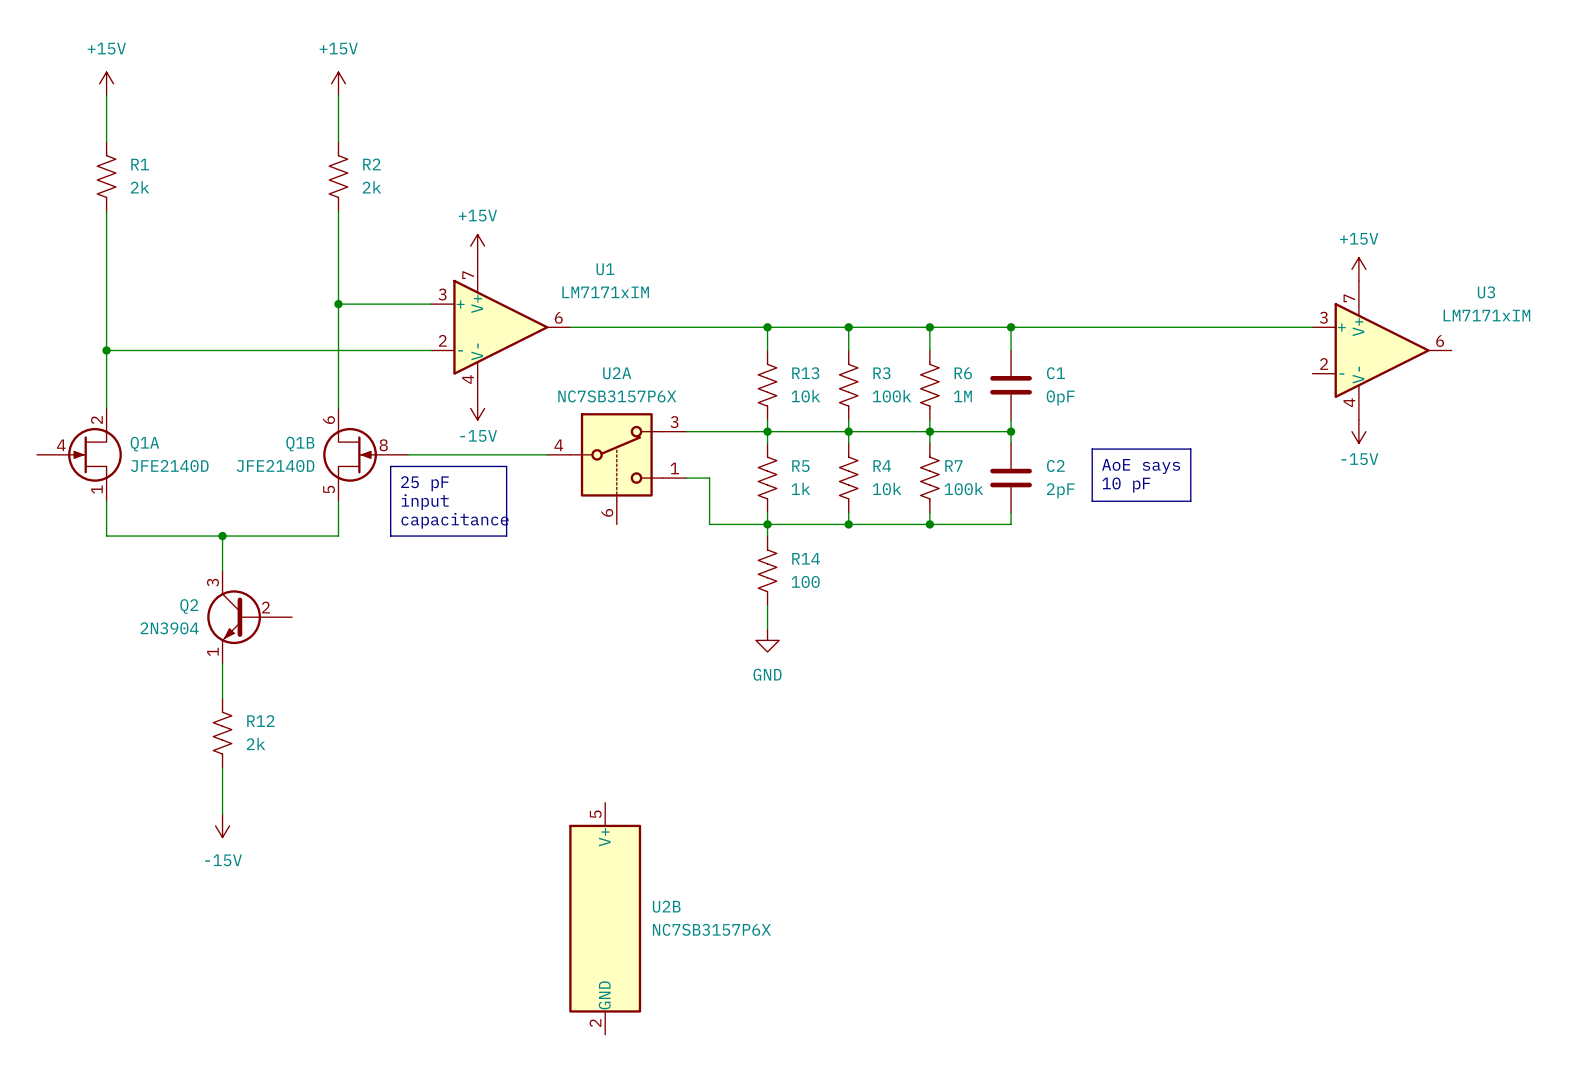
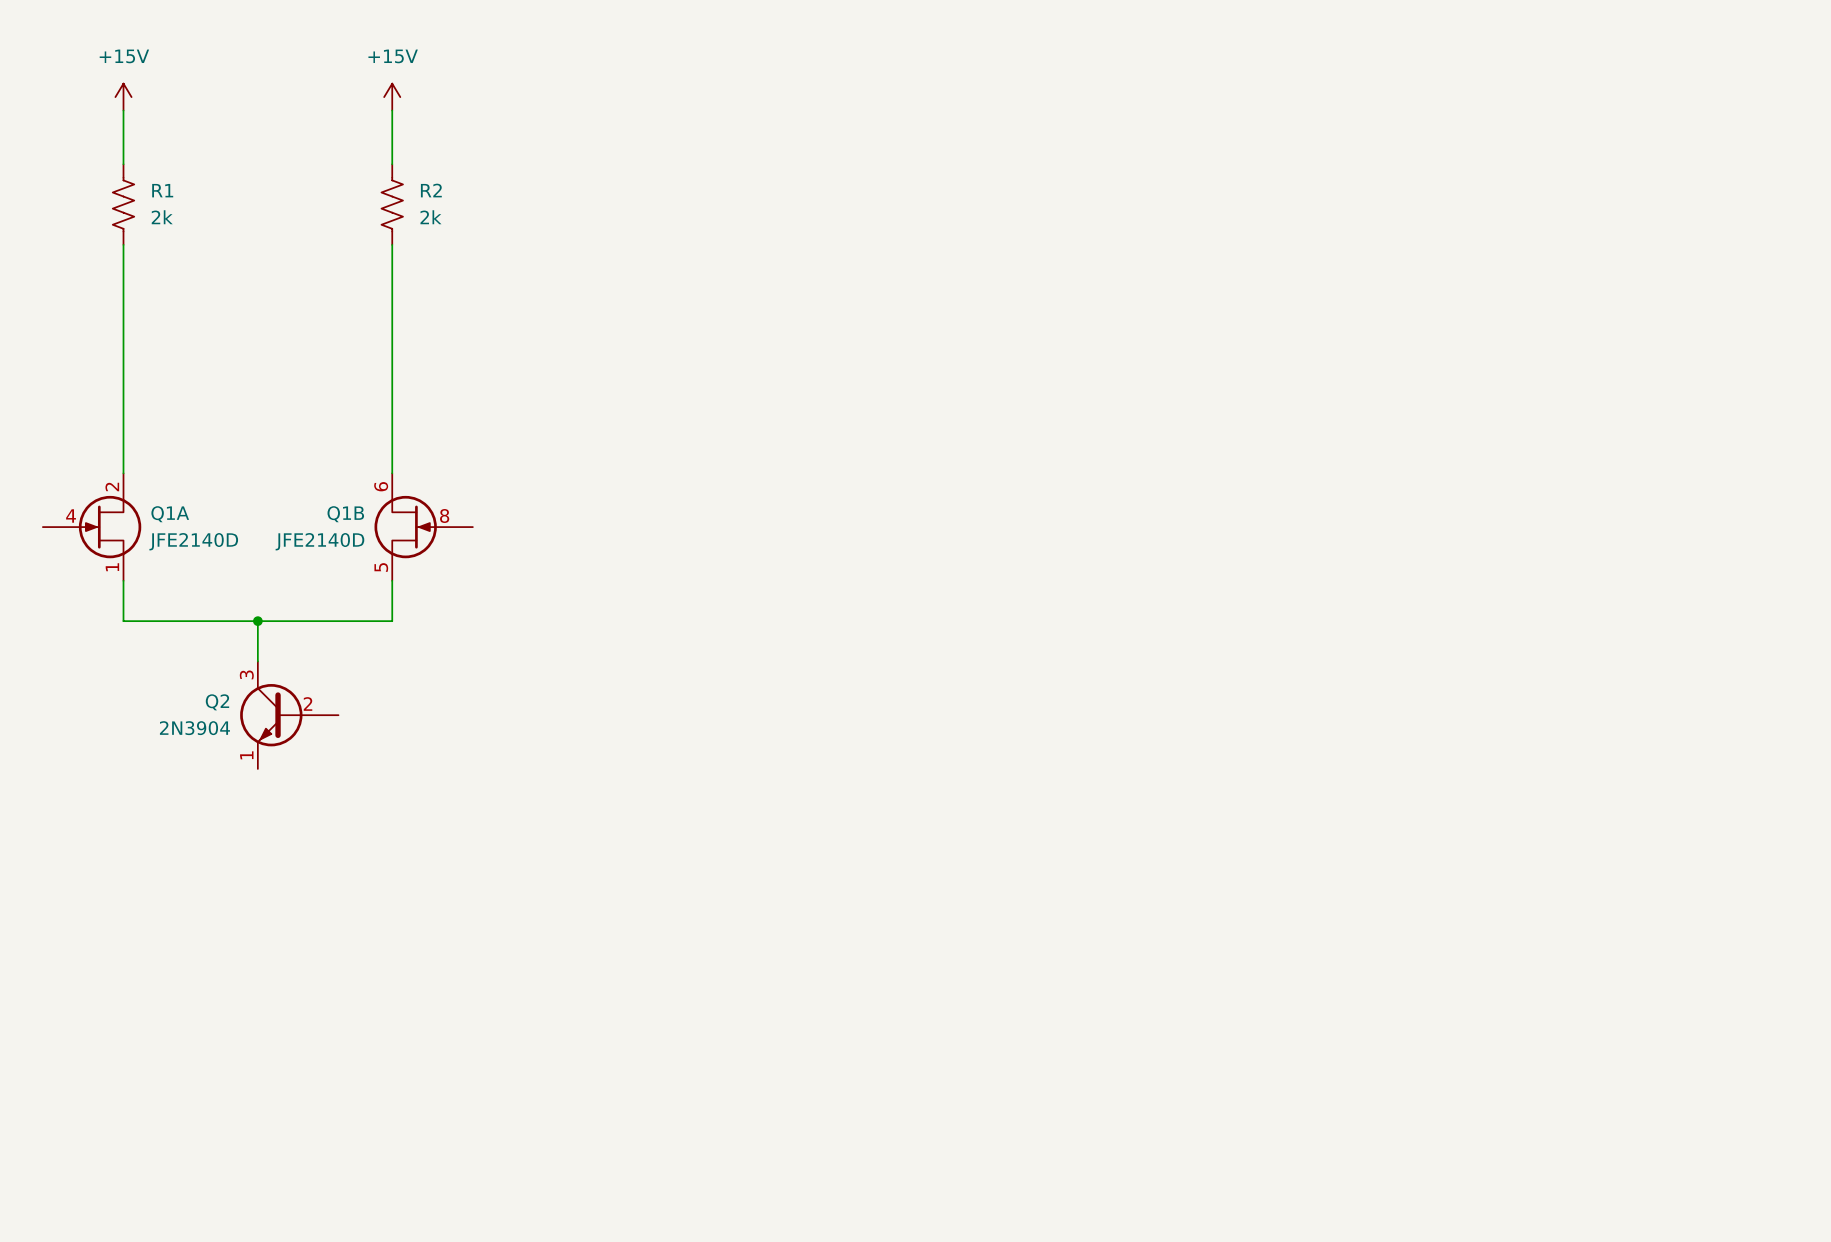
power symbol: +15V (477, 246) -> none
power symbol: +15V (1358, 269) -> none
wire: (338, 304) (431, 304) -> none
junction: (338, 304) -> none
U1: LM7171xIM (500, 327) -> none
wire: (570, 327) (1312, 327) -> none
wire: (767, 327) (767, 350) -> none
junction: (767, 327) -> none
wire: (848, 327) (848, 350) -> none
junction: (848, 327) -> none
wire: (929, 327) (929, 350) -> none
junction: (929, 327) -> none
wire: (1011, 327) (1011, 350) -> none
junction: (1011, 327) -> none
wire: (106, 350) (431, 350) -> none
junction: (106, 350) -> none
U3: LM7171xIM (1382, 350) -> none
R13: 10k (767, 385) -> none
R3: 100k (848, 385) -> none
R6: 1M (929, 385) -> none
C1: 0pF (1011, 385) -> none
power symbol: -15V (477, 408) -> none
wire: (767, 420) (767, 443) -> none
wire: (848, 420) (848, 443) -> none
wire: (929, 420) (929, 443) -> none
wire: (1011, 420) (1011, 443) -> none
wire: (686, 431) (1011, 431) -> none
junction: (767, 431) -> none
junction: (848, 431) -> none
junction: (929, 431) -> none
junction: (1011, 431) -> none
power symbol: -15V (1358, 431) -> none
line: (1092, 449) (1190, 449) (1190, 501) (1092, 501) (1092, 449) -> none
wire: (408, 454) (547, 454) -> none
line: (390, 466) (506, 466) (506, 536) (390, 536) (390, 466) -> none
text: AoE says (1141, 466) -> none
U2A: NC7SB3157P6X (616, 468) -> none
wire: (686, 478) (709, 478) (709, 524) (1011, 524) (1011, 512) -> none
R5: 1k (767, 478) -> none
R4: 10k (848, 478) -> none
R7: 100k (929, 478) -> none
C2: 2pF (1011, 478) -> none
text: 25 pF (424, 483) -> none
text: 10 pF (1126, 485) -> none
text: input (425, 502) -> none
wire: (767, 512) (767, 536) -> none
wire: (848, 512) (848, 524) -> none
wire: (929, 512) (929, 524) -> none
text: capacitance (455, 520) -> none
junction: (767, 524) -> none
junction: (848, 524) -> none
junction: (929, 524) -> none
R14: 100 (767, 570) -> none
wire: (767, 605) (767, 628) -> none
power symbol: GND (767, 640) -> none
wire: (222, 663) (222, 698) -> none
R12: 2k (222, 733) -> none
wire: (222, 767) (222, 814) -> none
power symbol: -15V (222, 825) -> none
U2B: NC7SB3157P6X (605, 918) -> none

